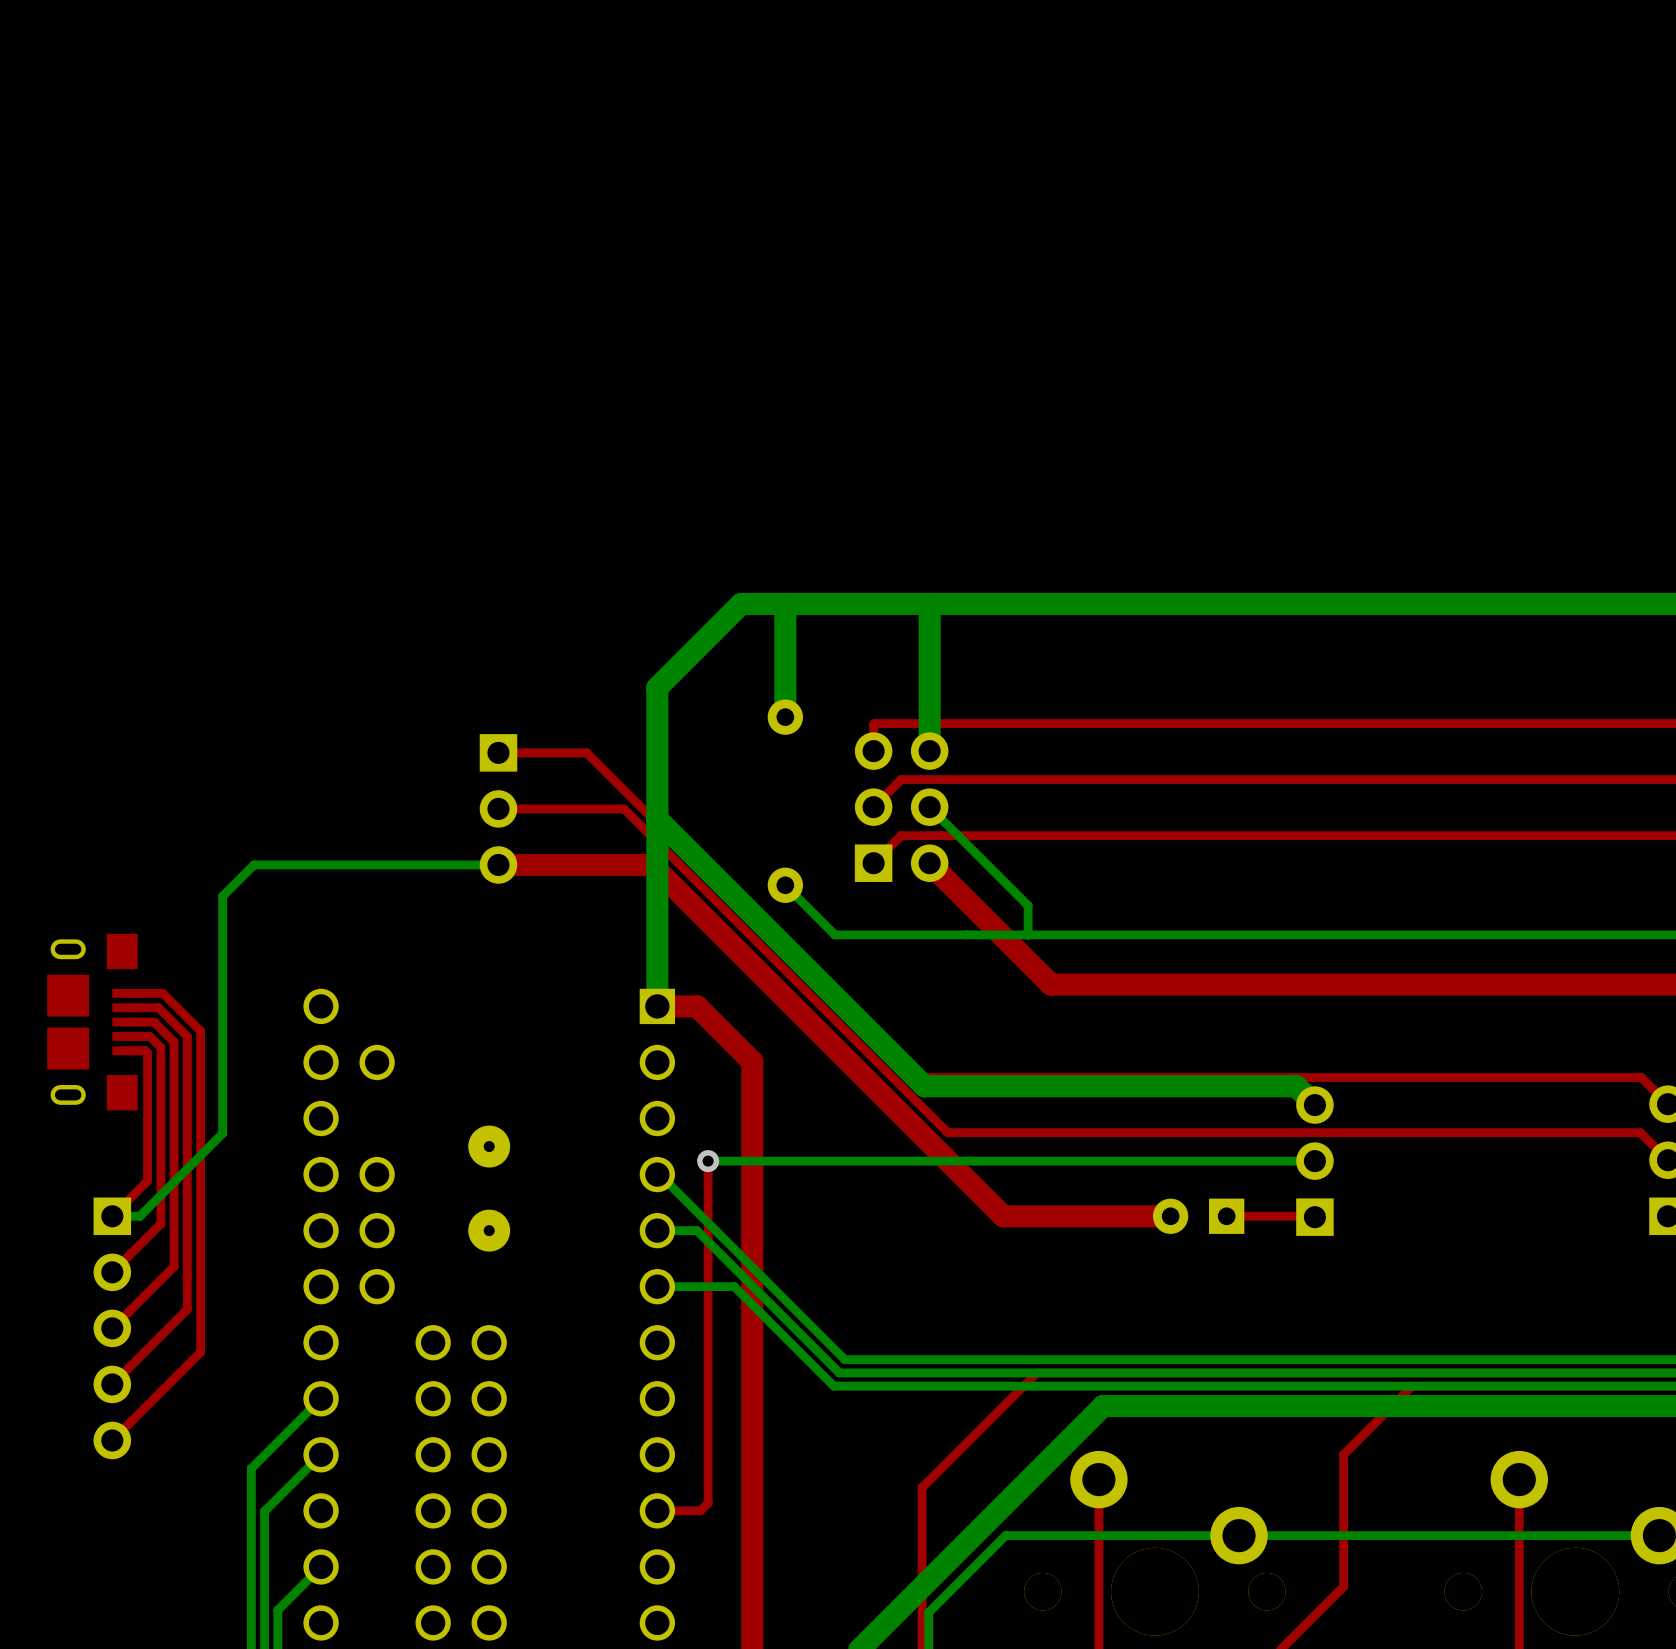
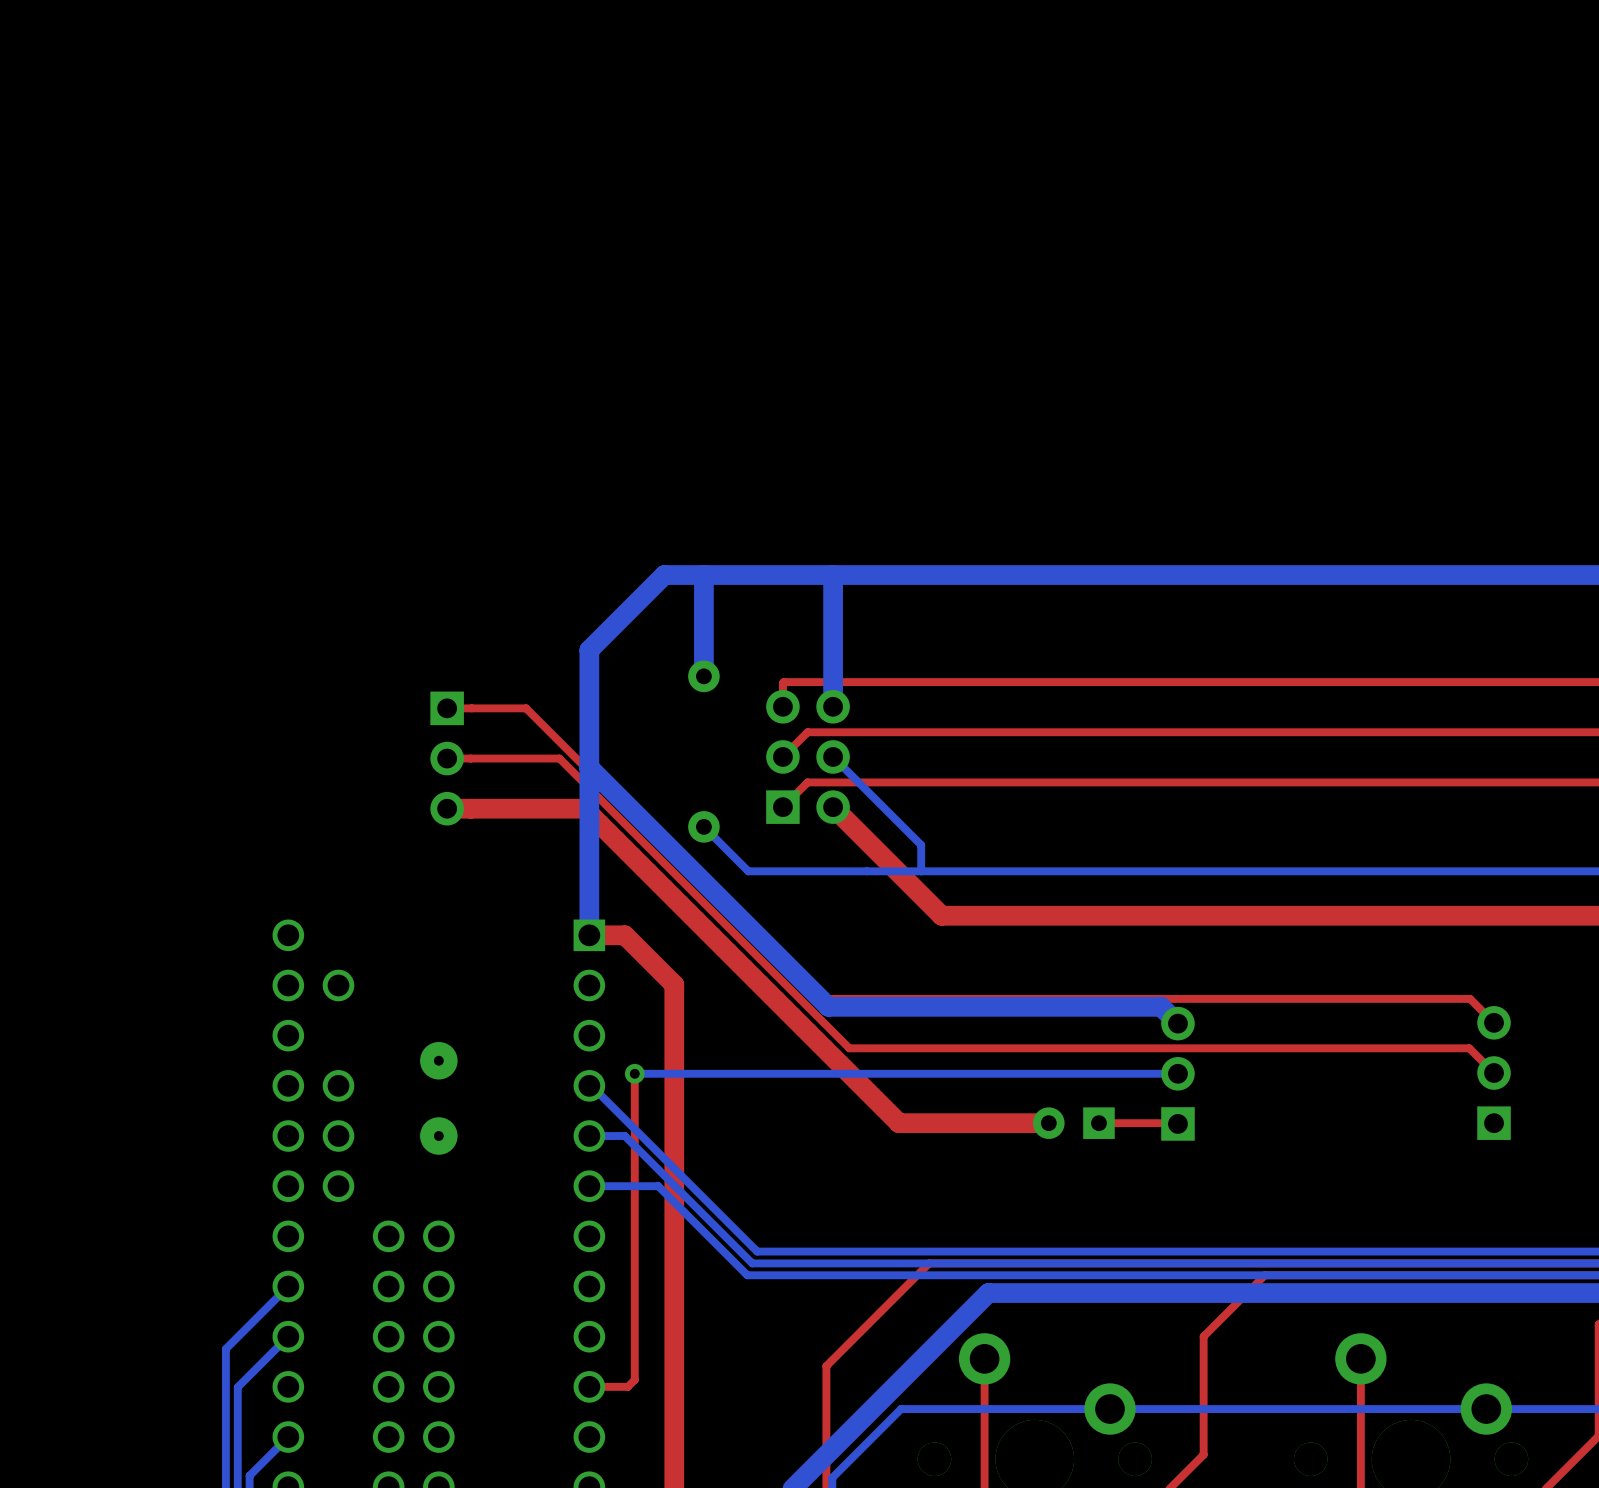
bottom track: (498, 864) (253, 864) (222, 896) (222, 1133) (139, 1216) (112, 1216) -> none
top track: (127, 993) (162, 993) (200, 1031) (200, 1352) (112, 1440) -> none
top track: (127, 1007) (158, 1007) (187, 1036) (187, 1309) (112, 1384) -> none
part: (94, 1022) -> none
top track: (127, 1022) (154, 1022) (174, 1042) (174, 1266) (112, 1328) -> none
top track: (127, 1036) (149, 1036) (160, 1047) (160, 1223) (112, 1272) -> none
top track: (127, 1050) (145, 1050) (147, 1052) (147, 1180) (112, 1216) -> none
part: (112, 1328) -> none

